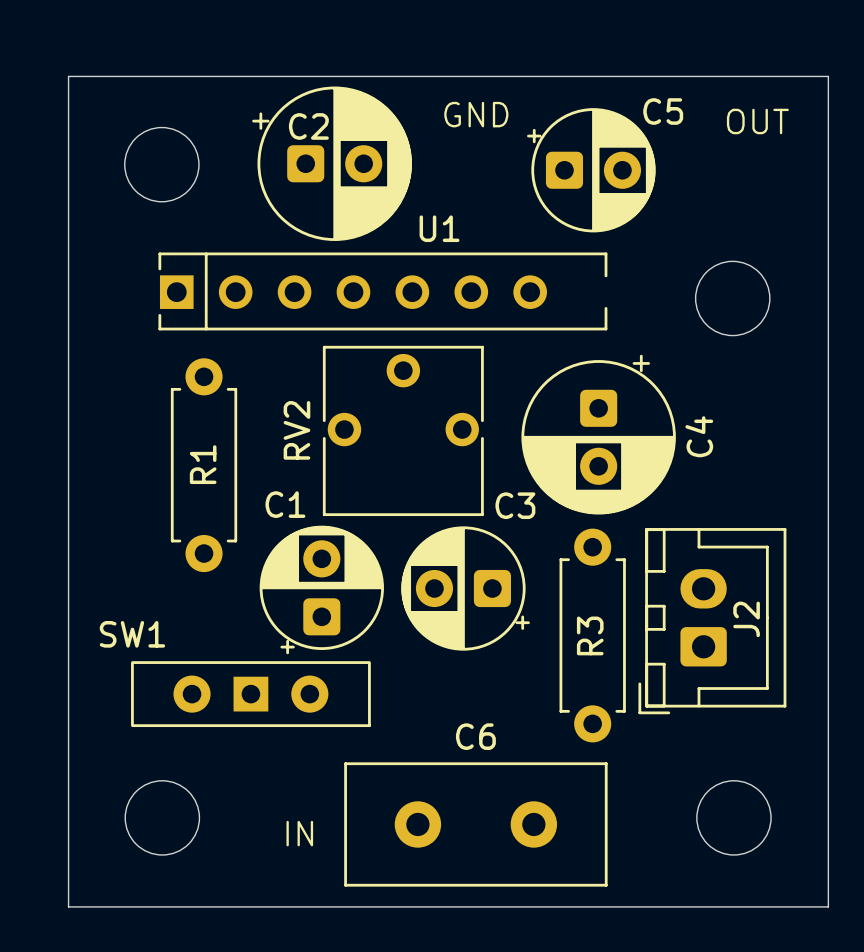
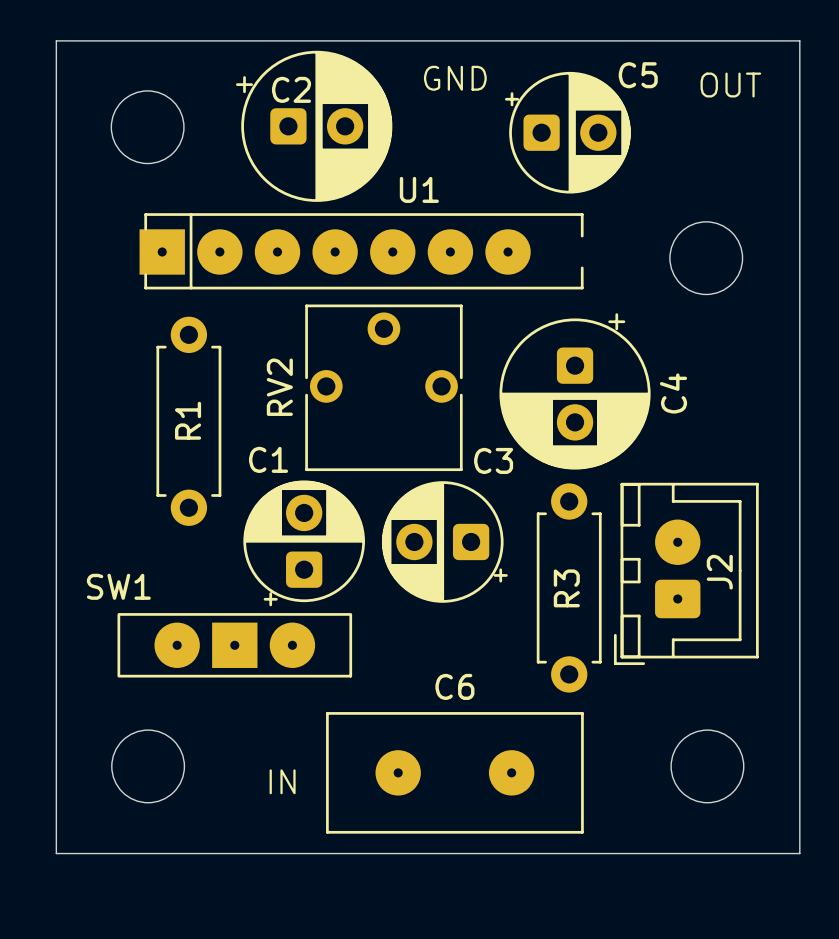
U1 footprint: [158, 252, 608, 331] -> [139, 213, 584, 290]
J2 footprint: [638, 528, 787, 715] -> [613, 482, 759, 666]
SW1 footprint: [131, 661, 371, 728] -> [117, 613, 353, 678]
C6 footprint: [344, 762, 608, 887] -> [326, 712, 584, 834]

